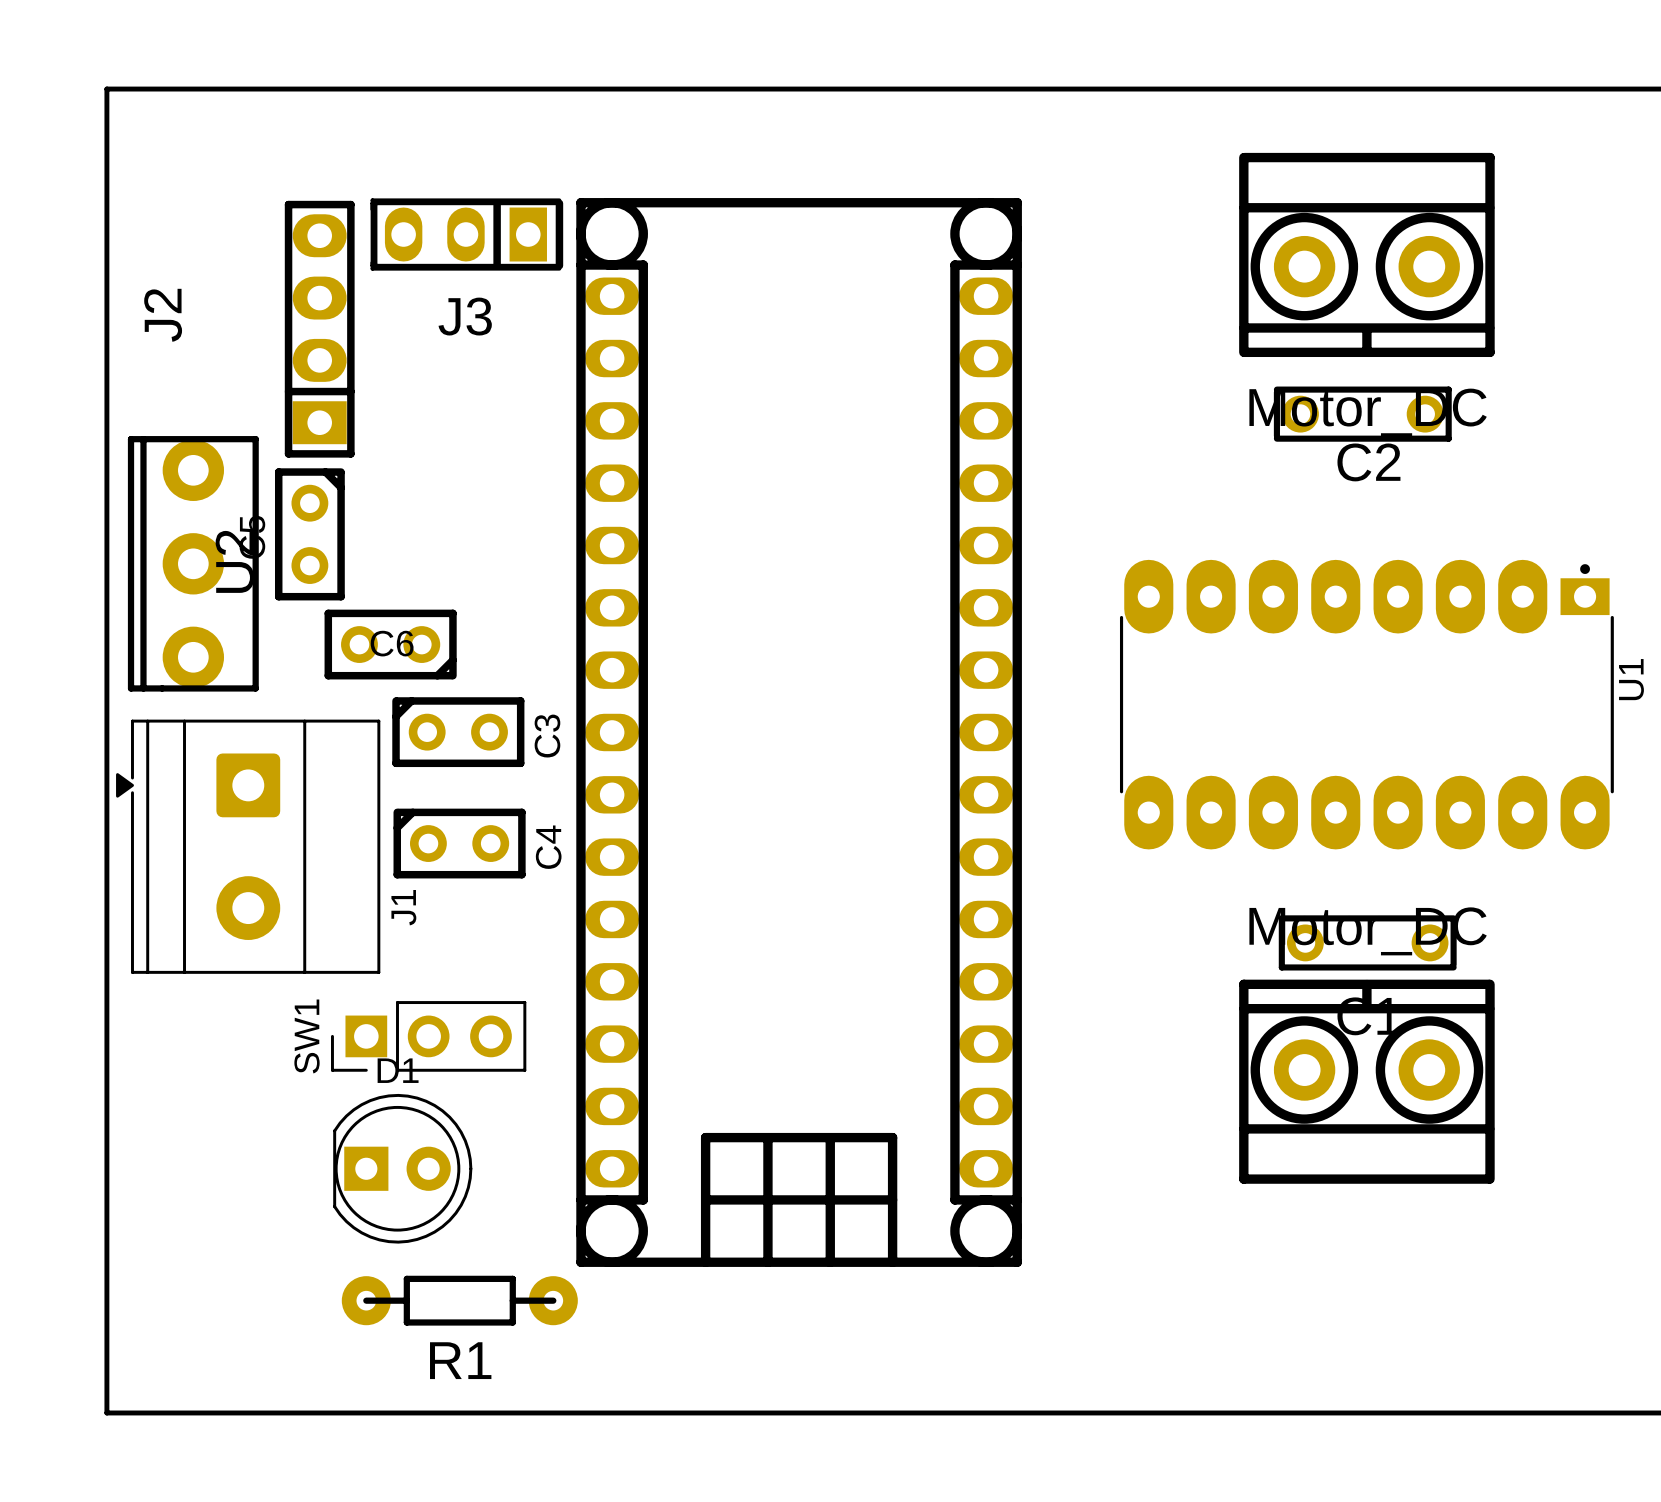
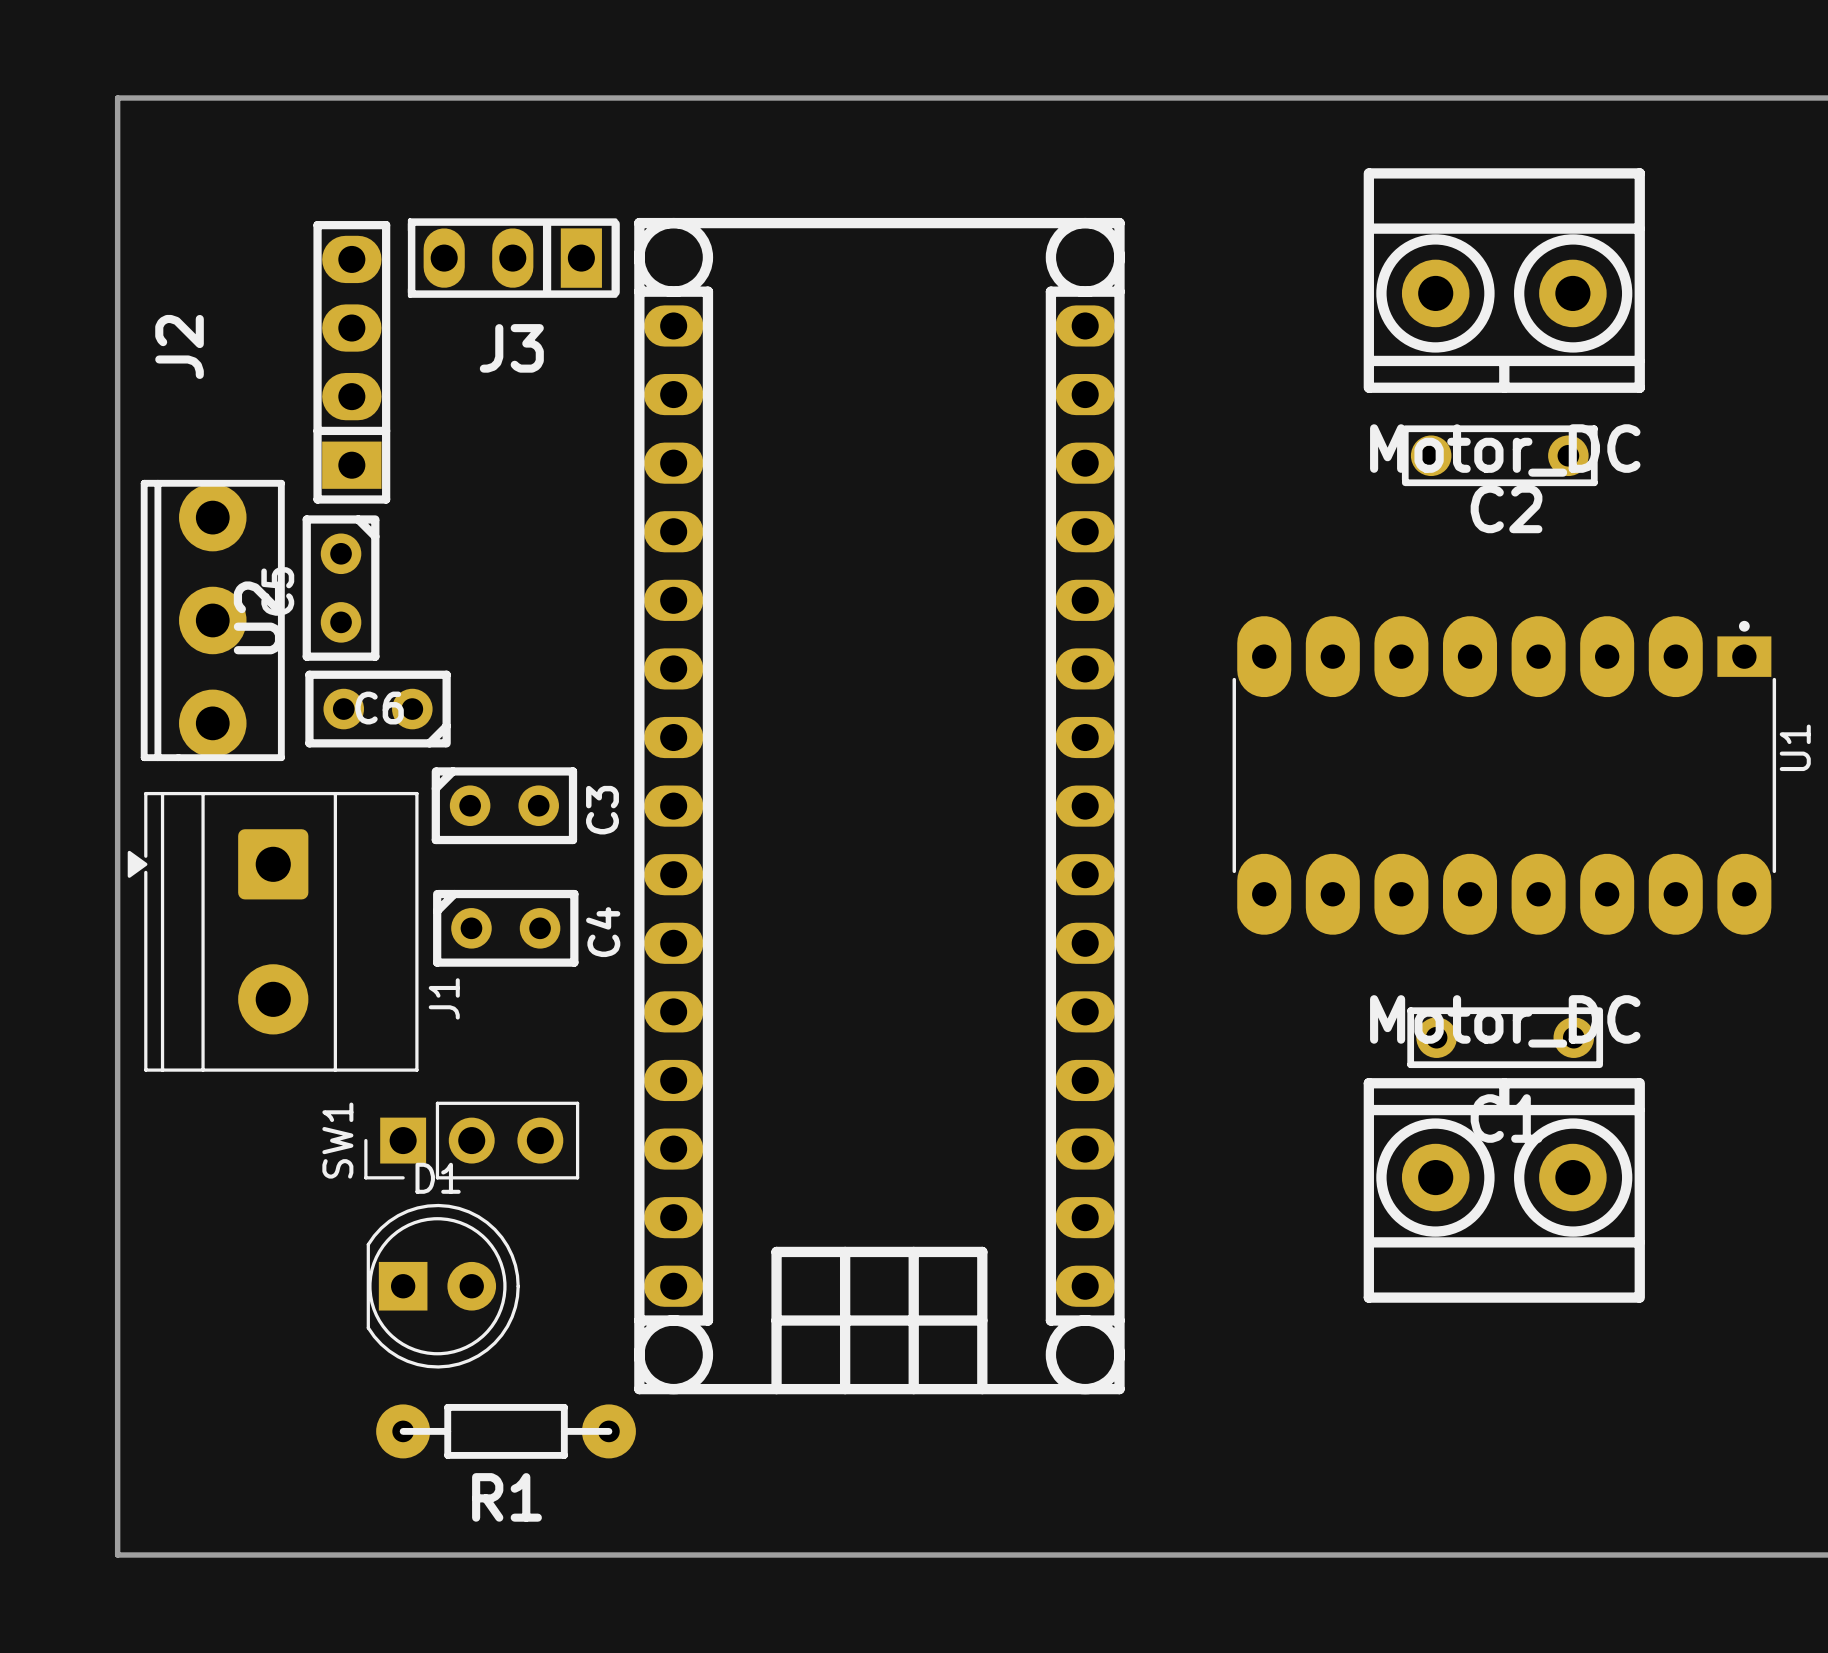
C6 position: (390, 644) -> (378, 709)

